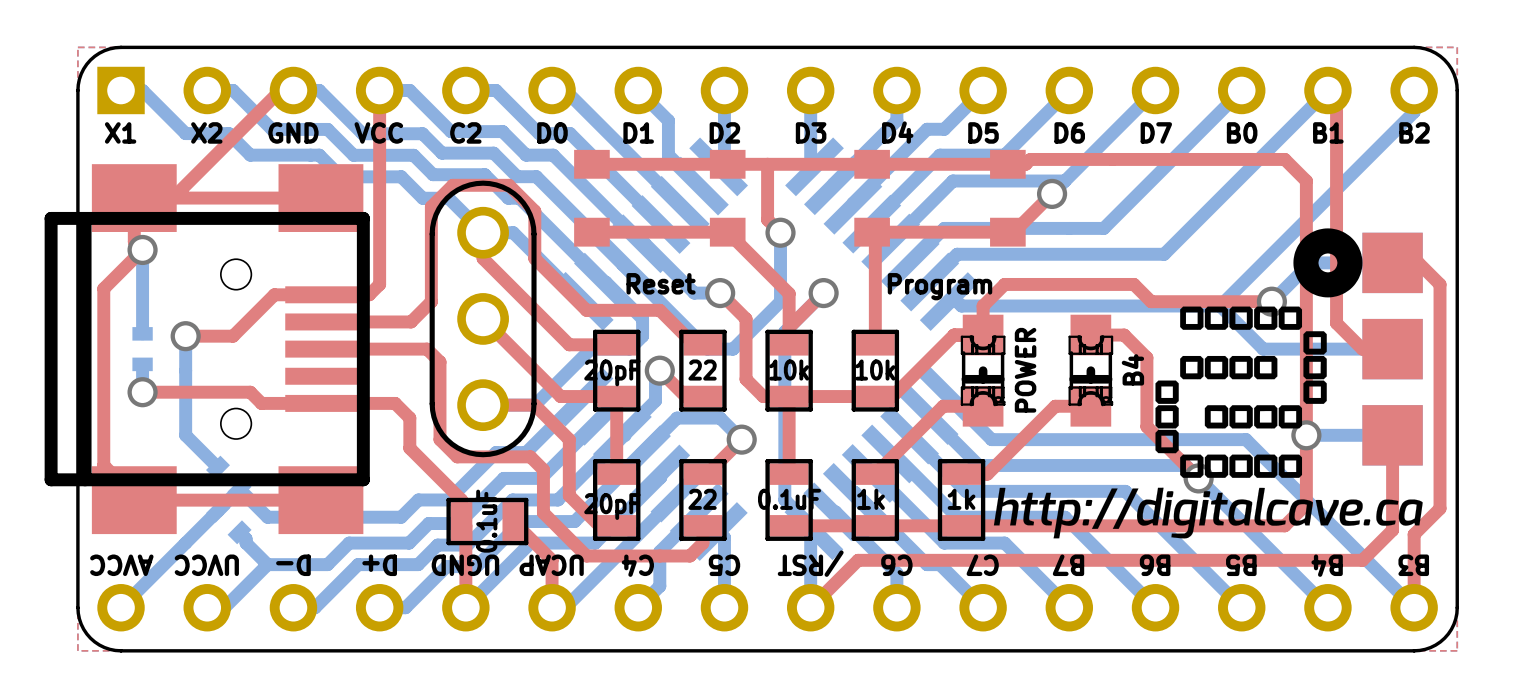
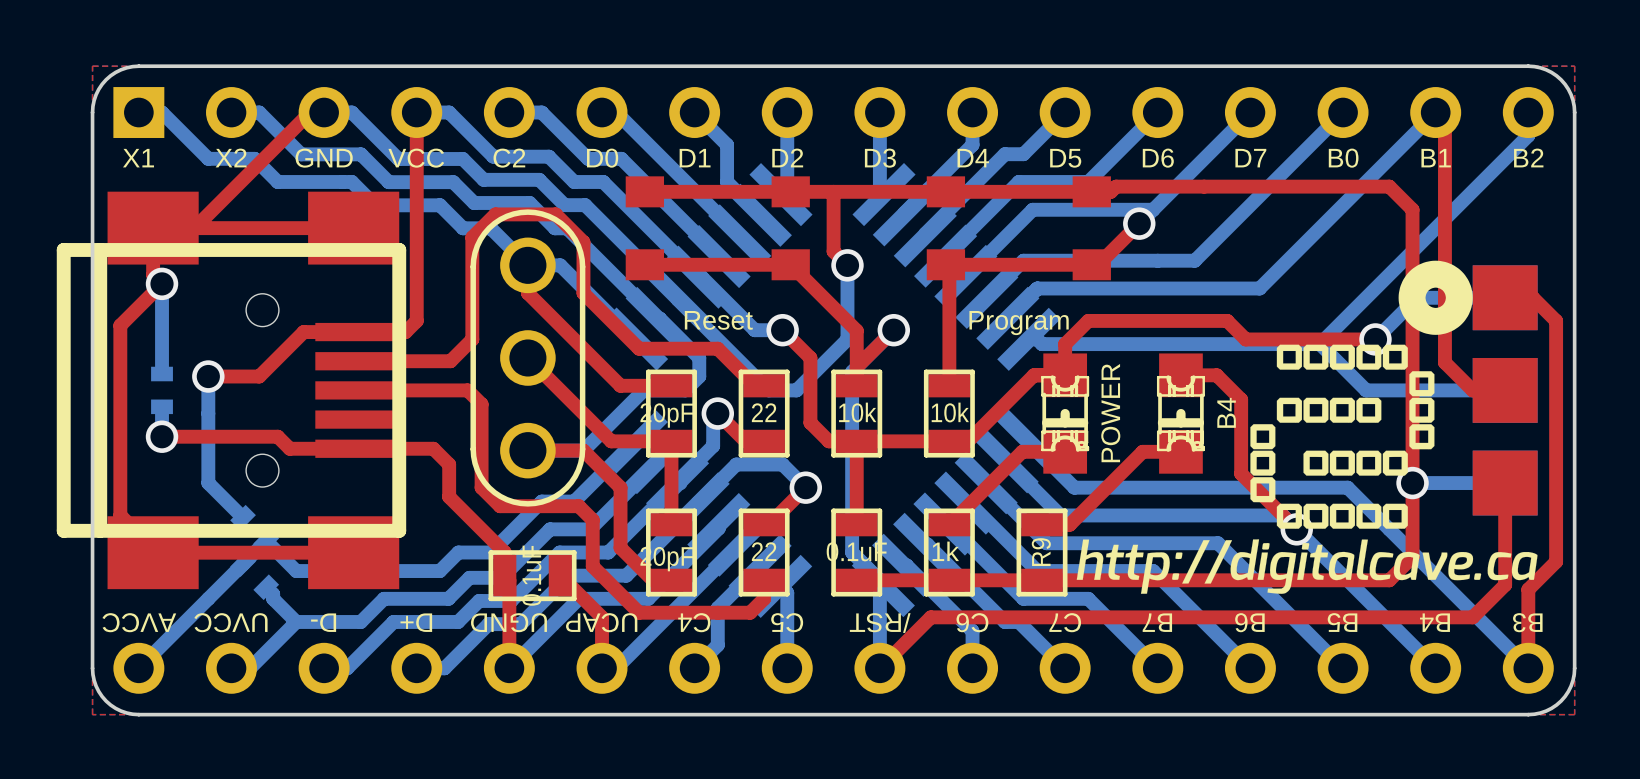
R9 name: none -> R9 (1041, 552)
R9 value: 1k (961, 499) -> none

